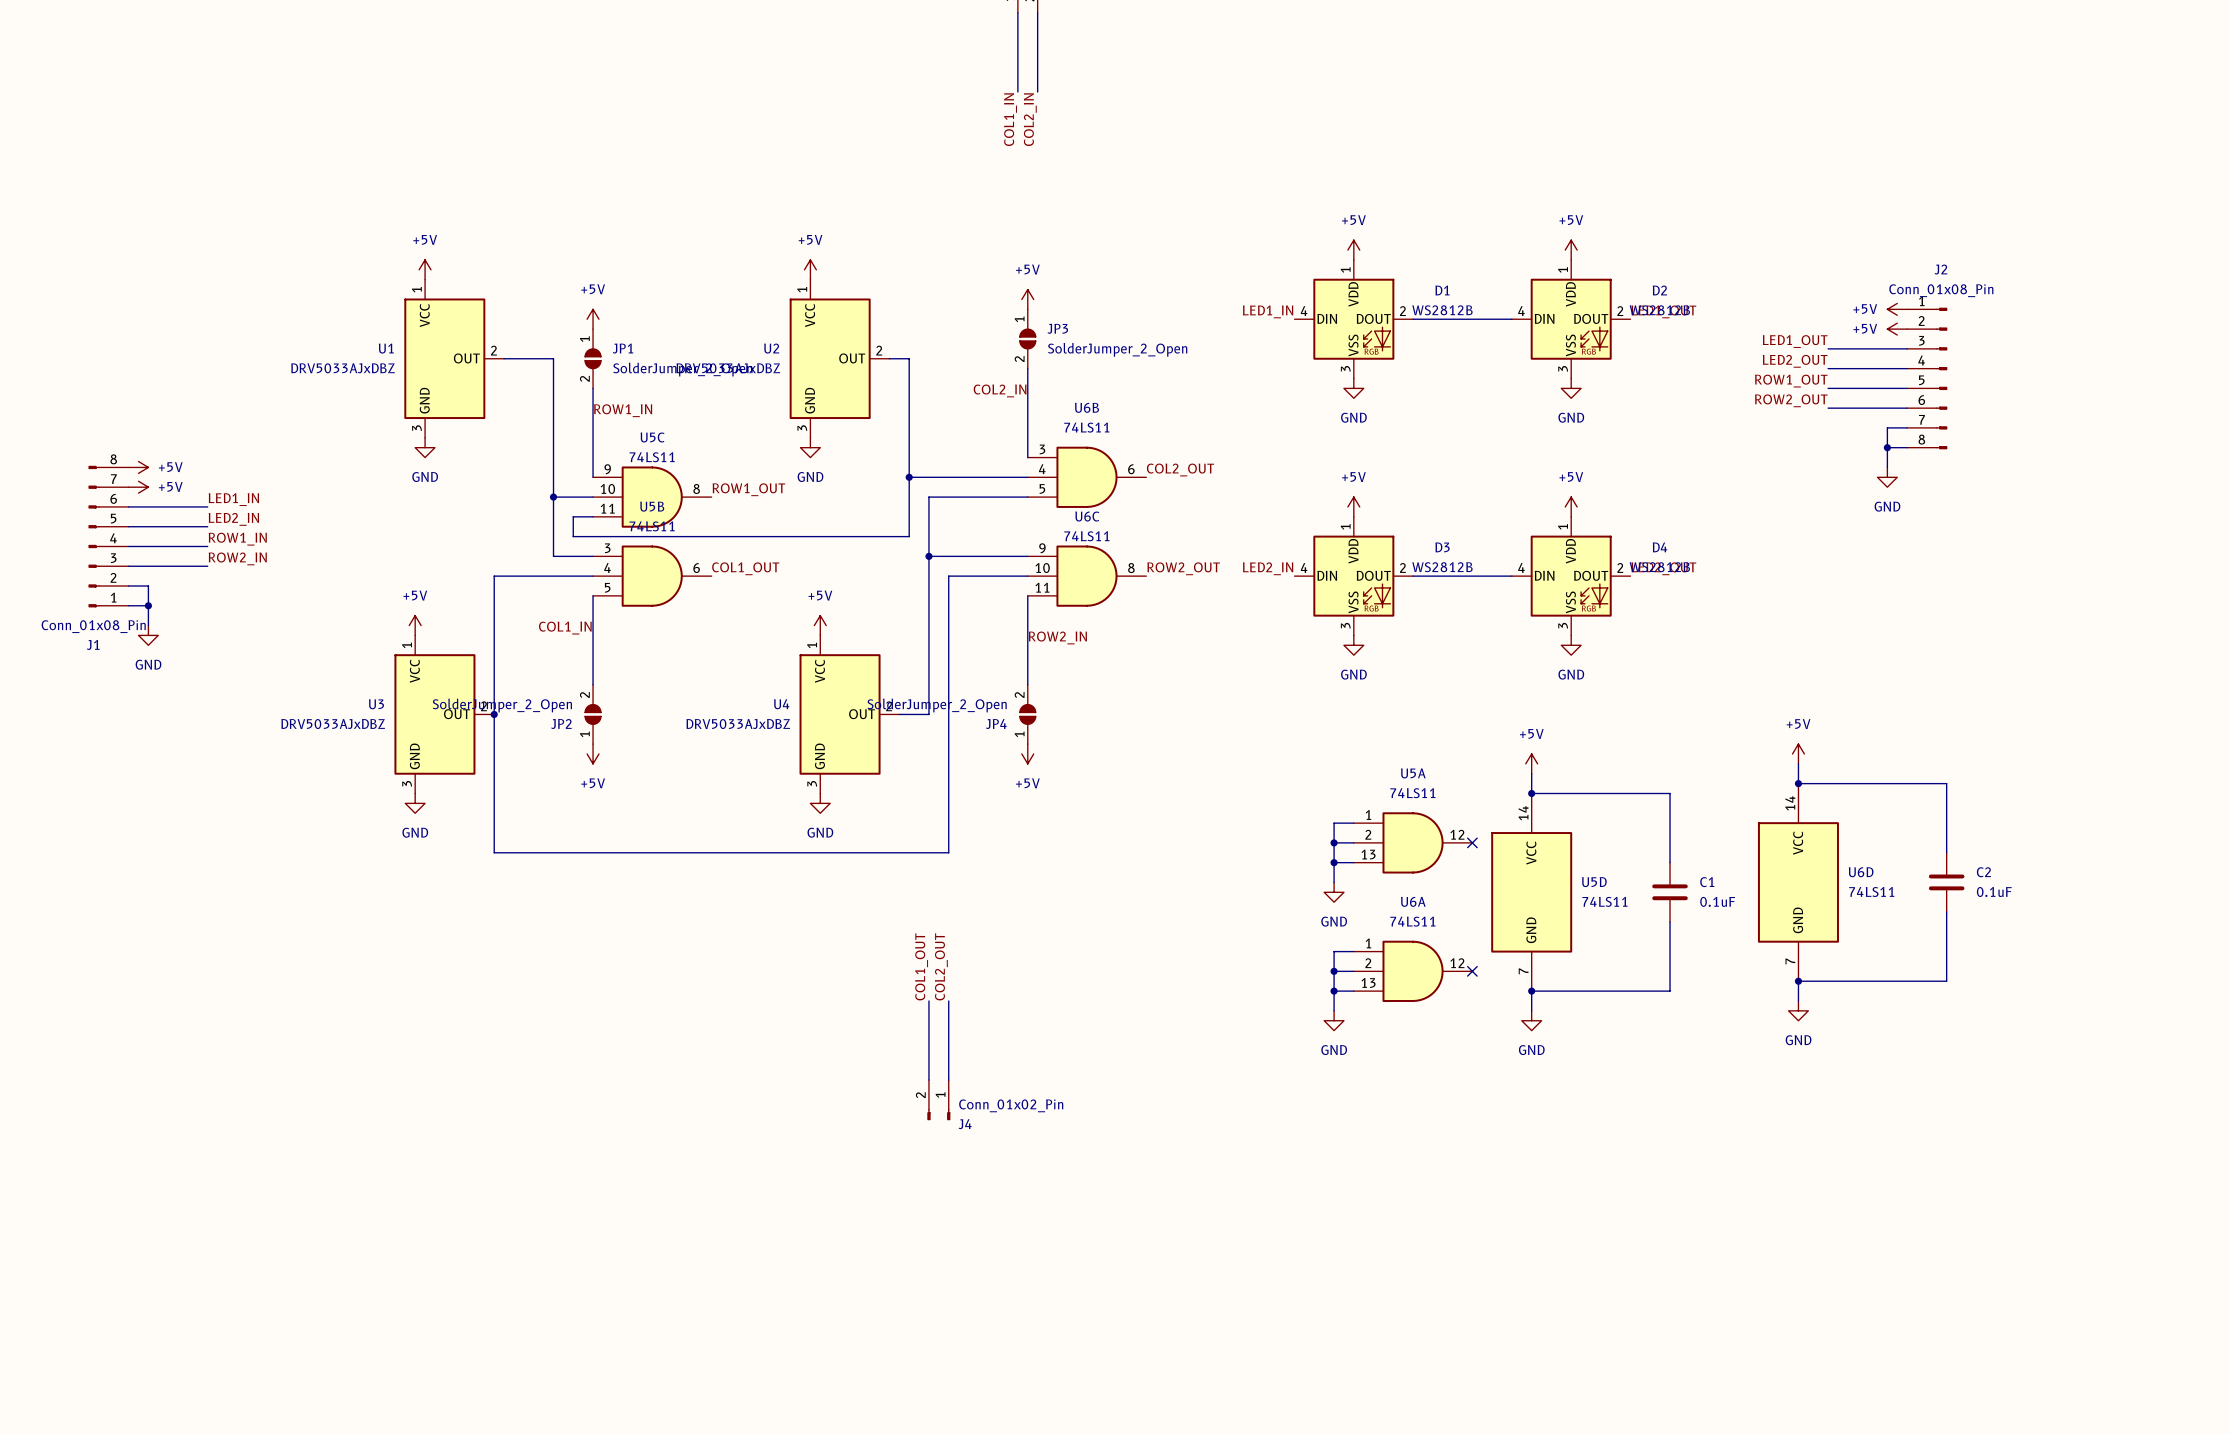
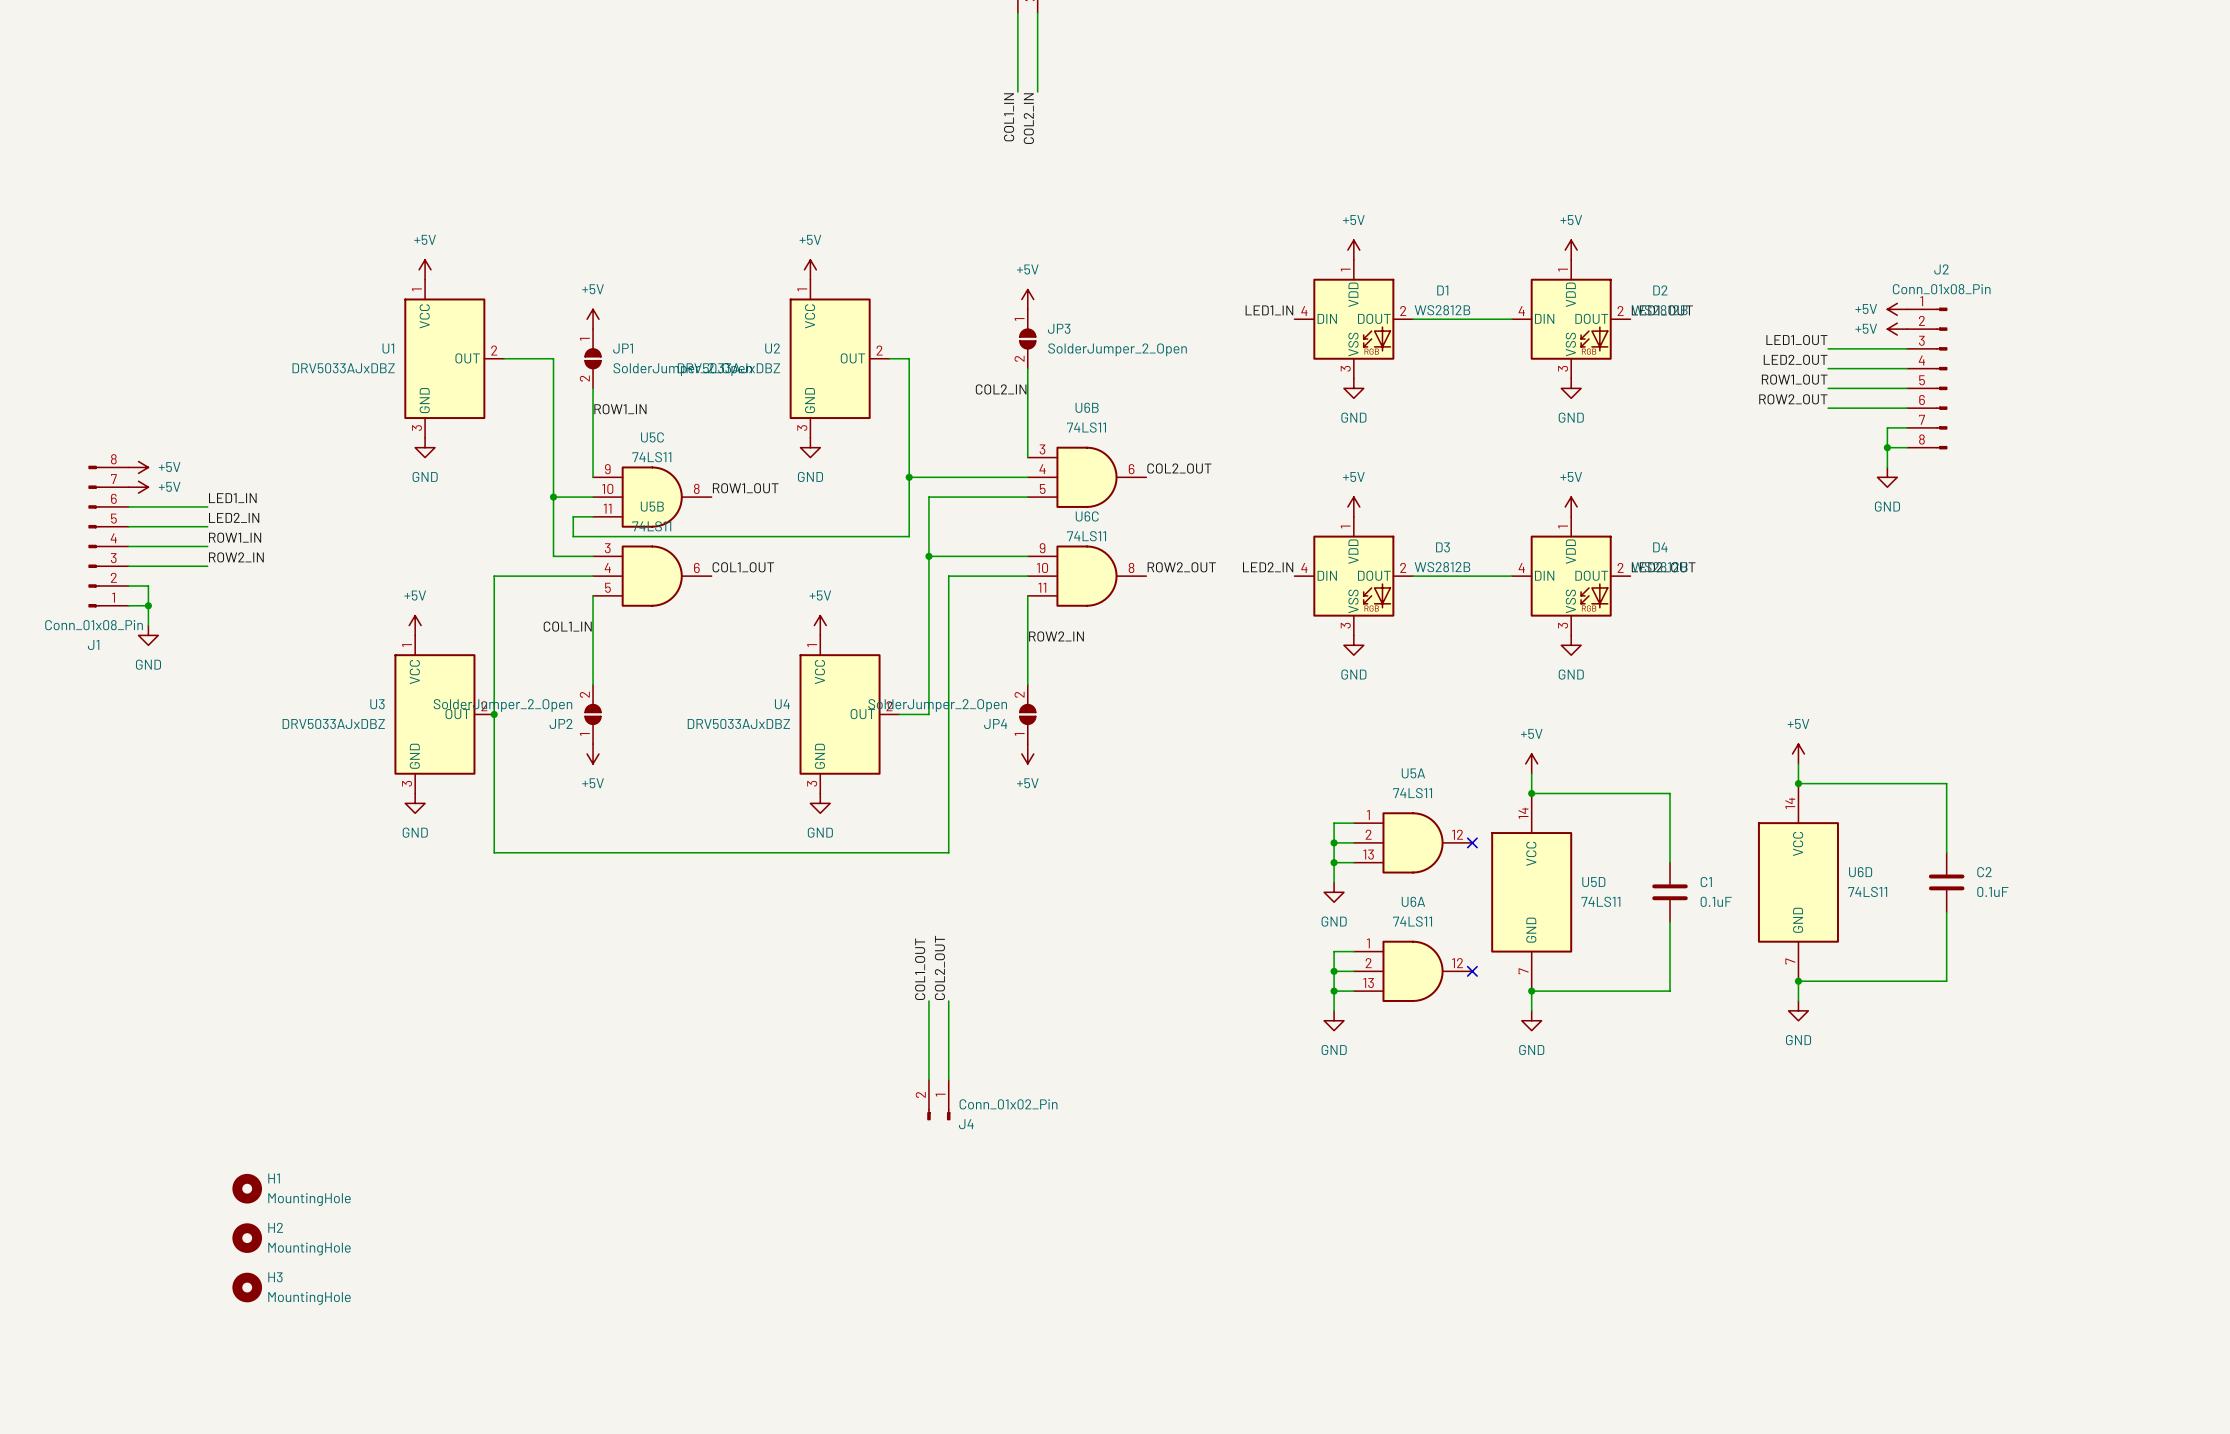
H1: none -> MountingHole (247, 1188)
H2: none -> MountingHole (247, 1238)
H3: none -> MountingHole (247, 1287)

